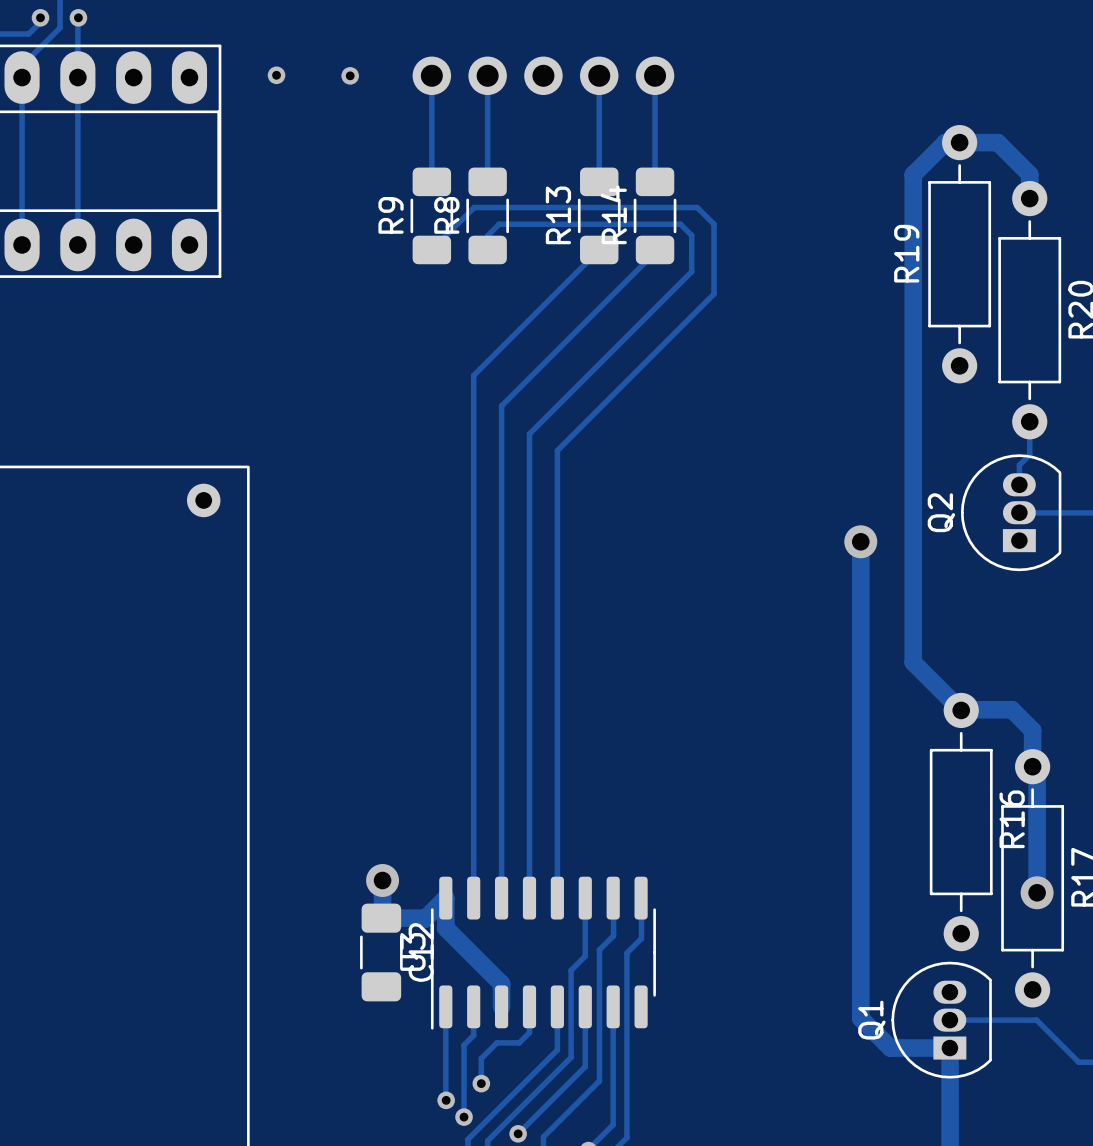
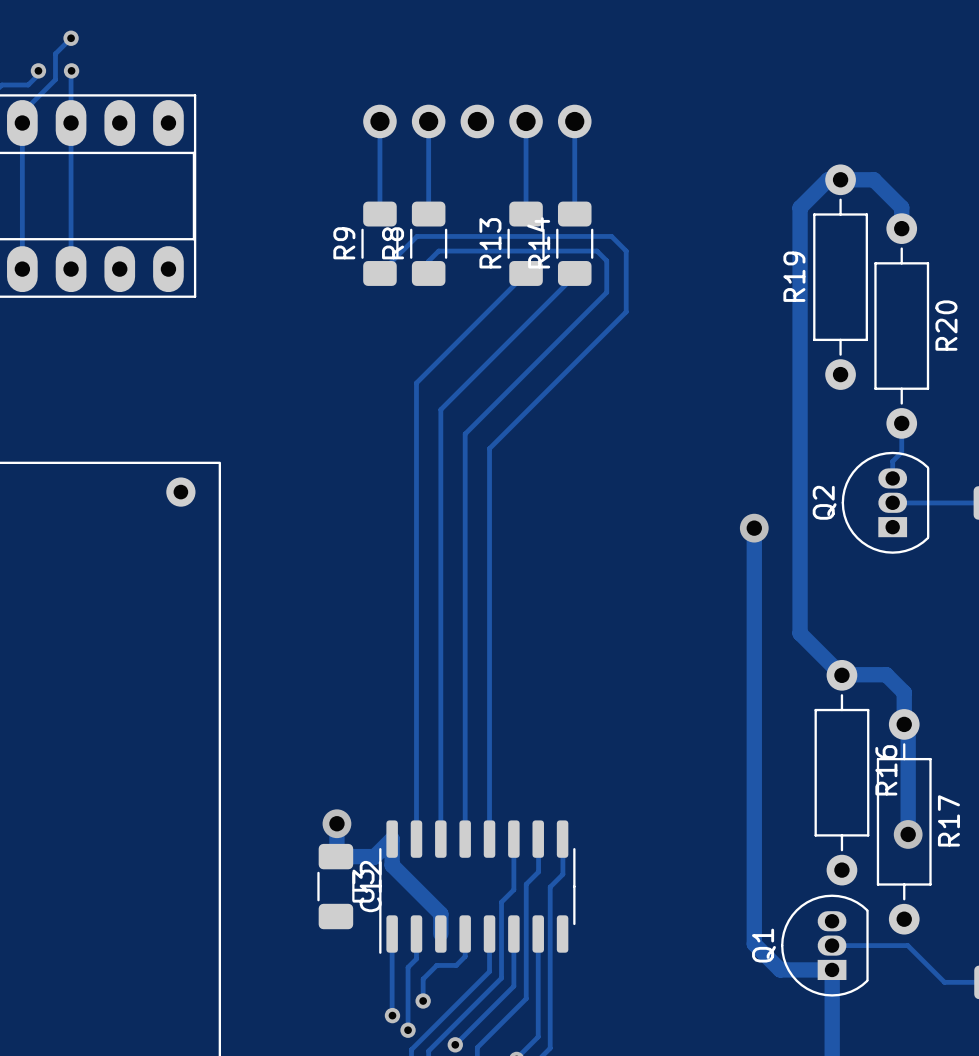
via: (276, 75) -> none
via: (350, 75) -> none

